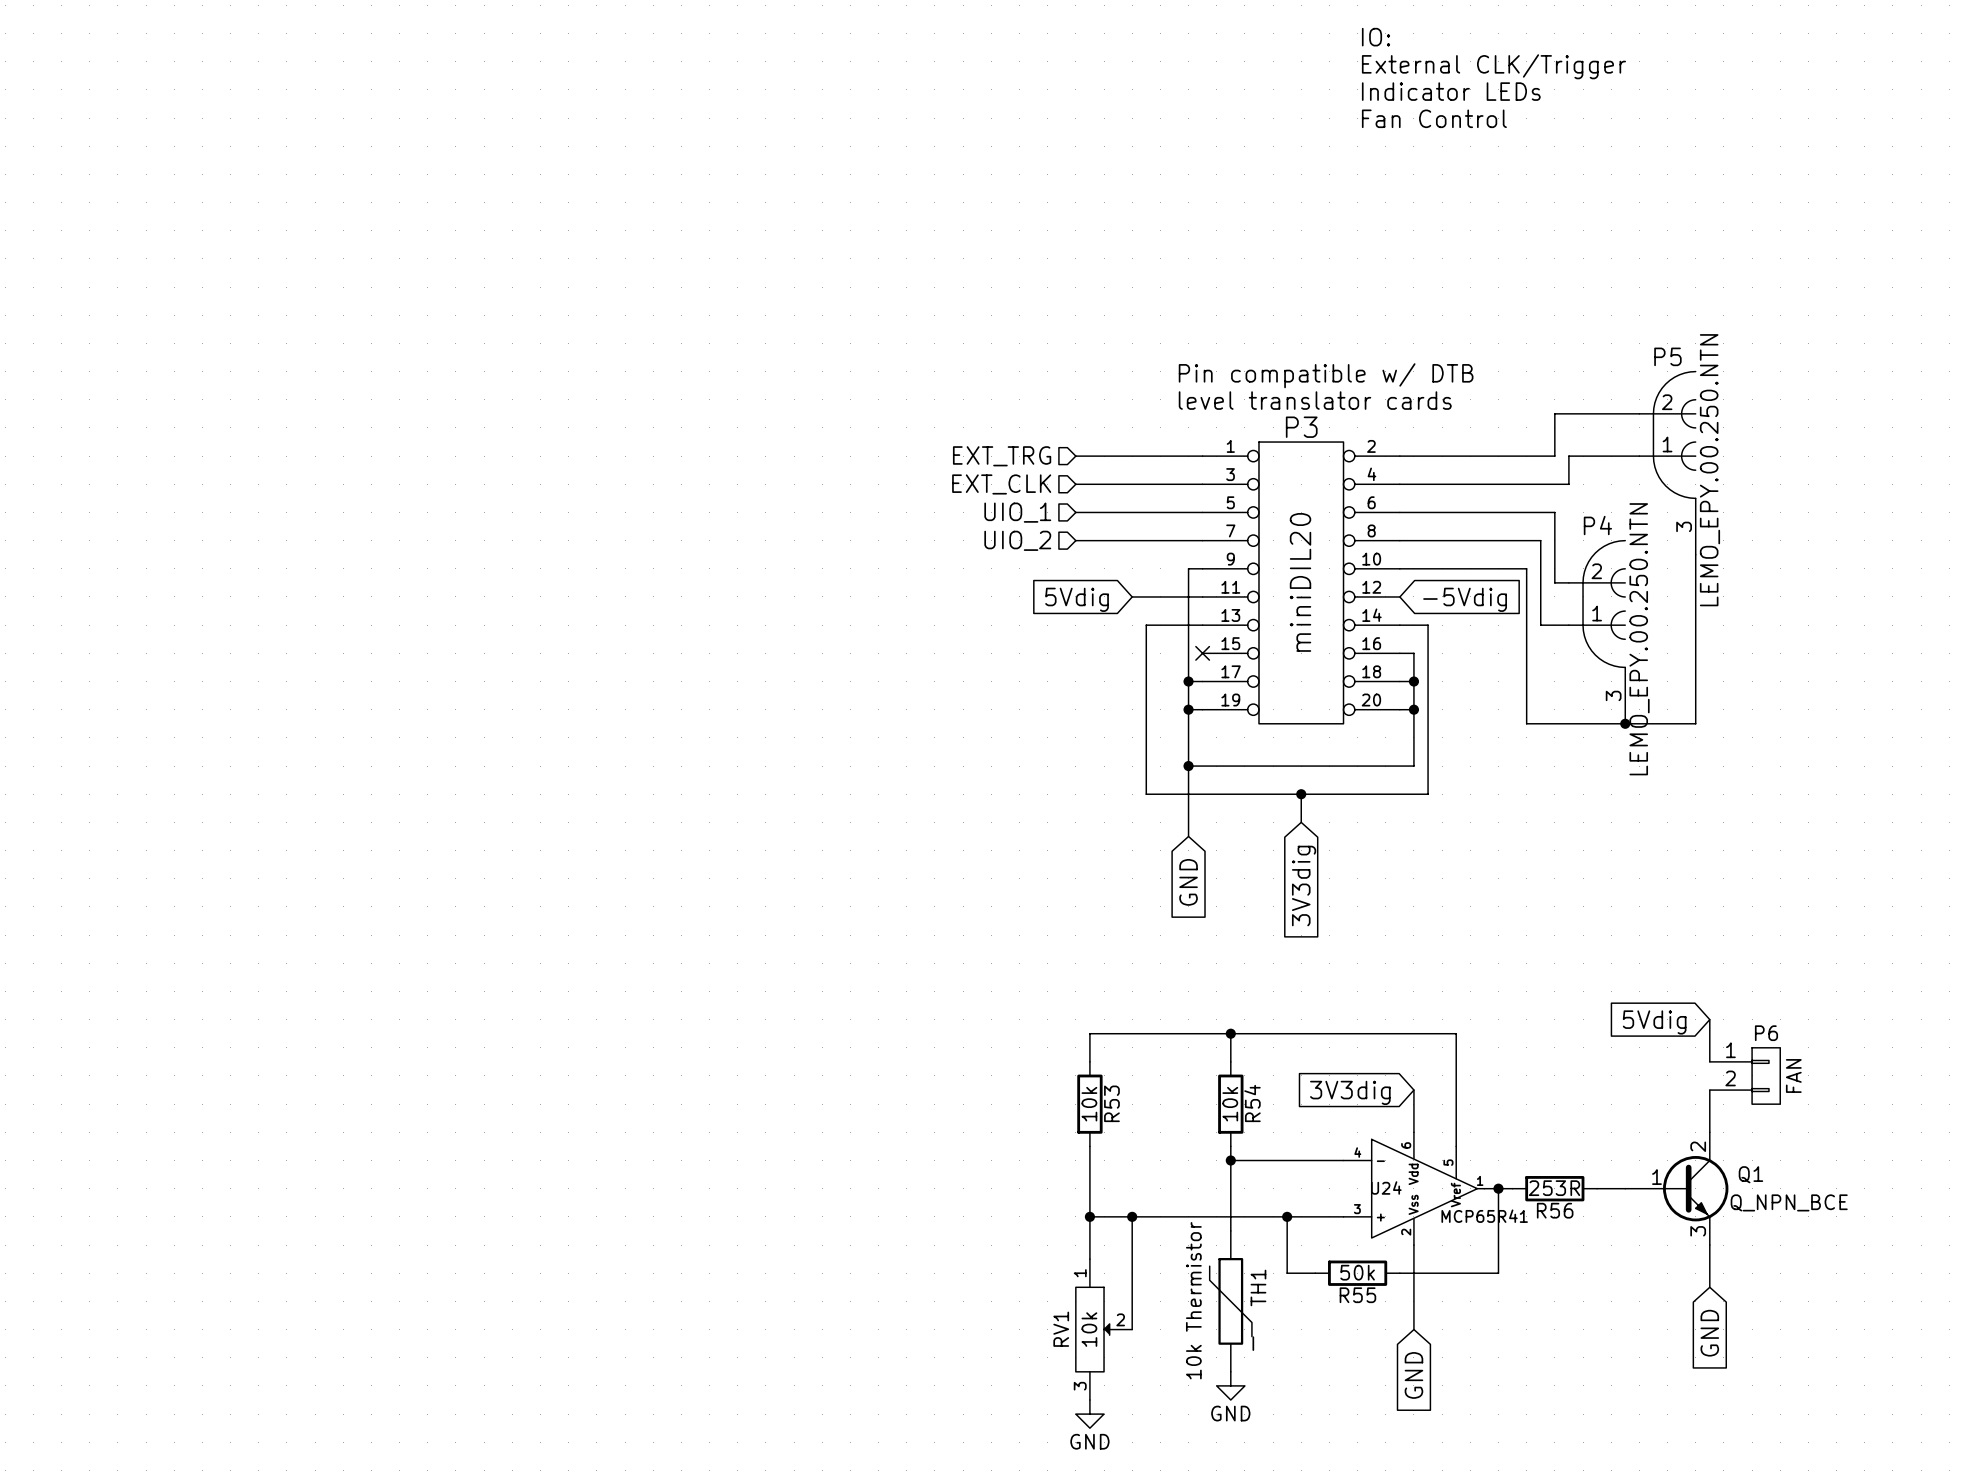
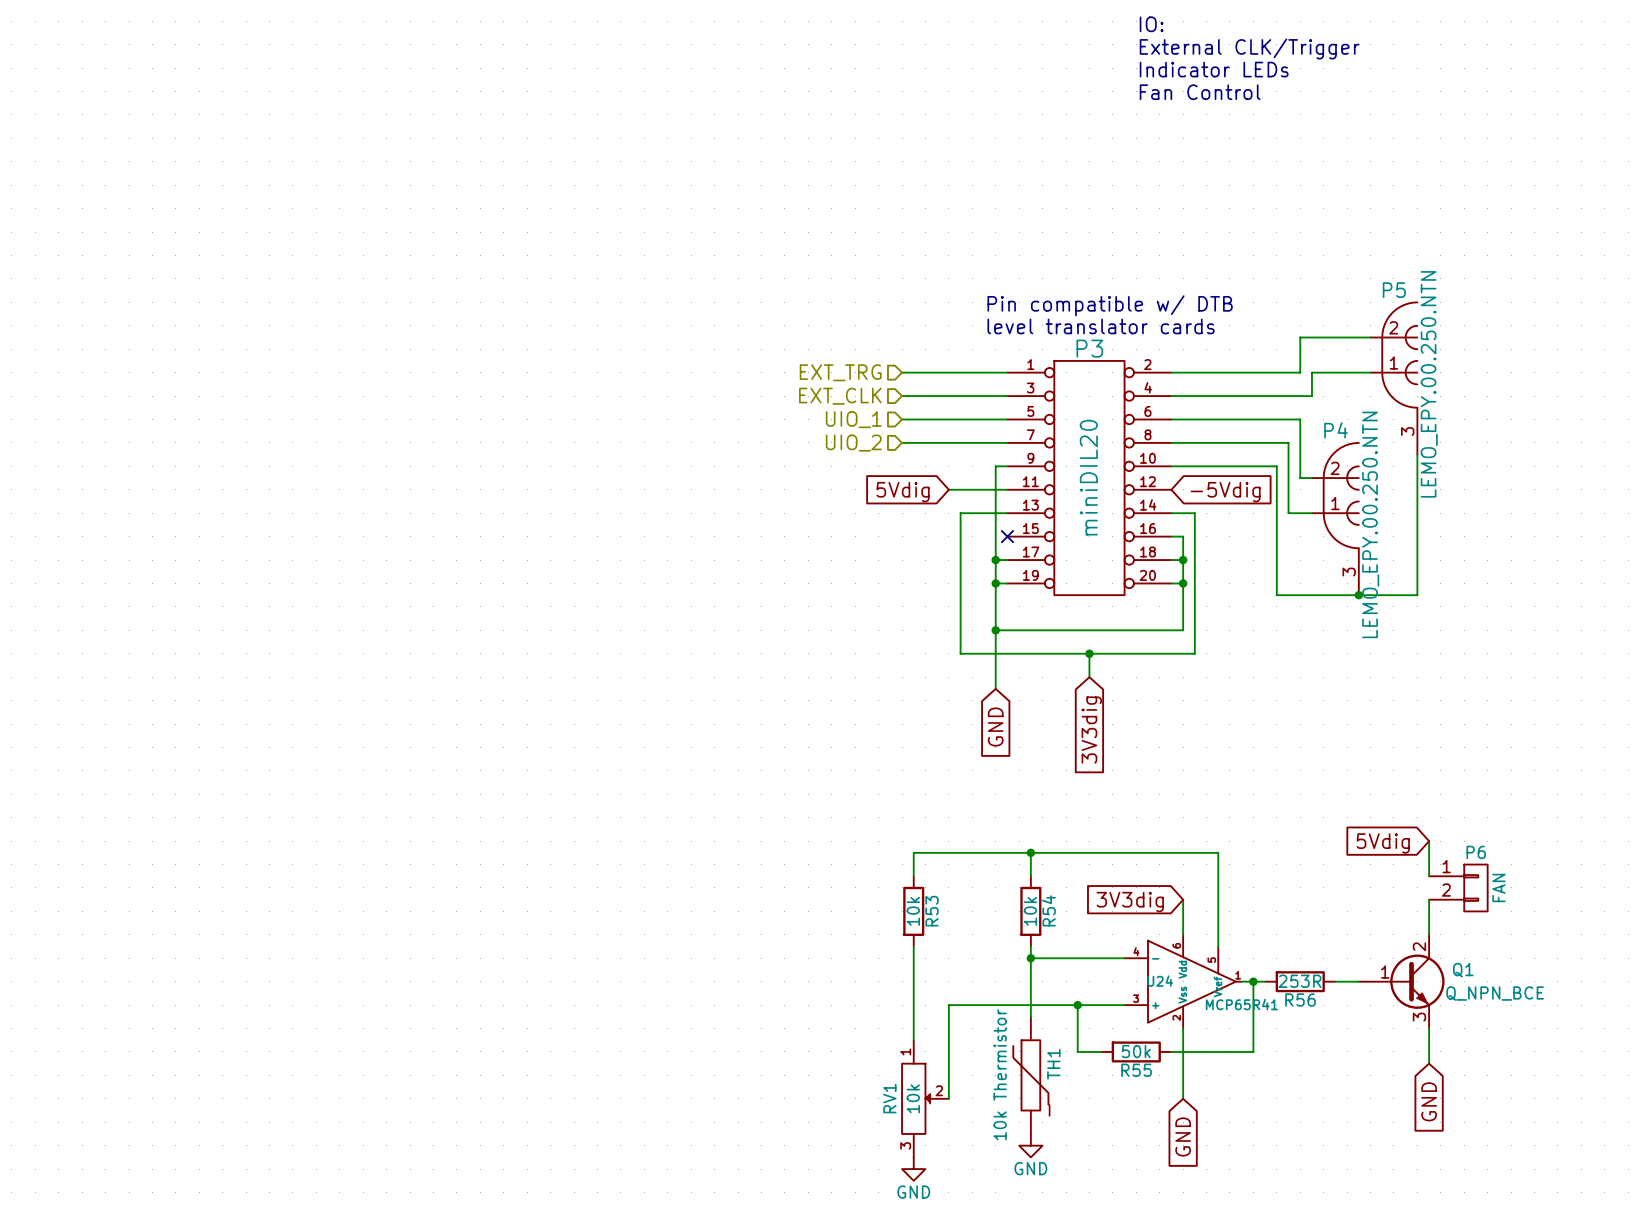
wire: (1089, 1216) (1132, 1216) -> none
junction: (1089, 1216) -> none
junction: (1132, 1216) -> none

